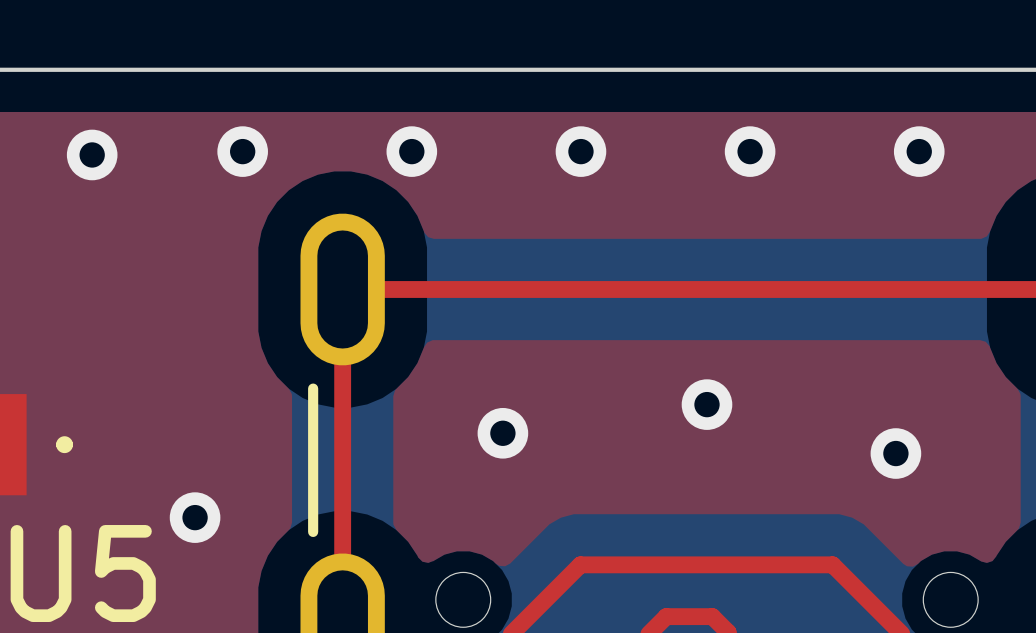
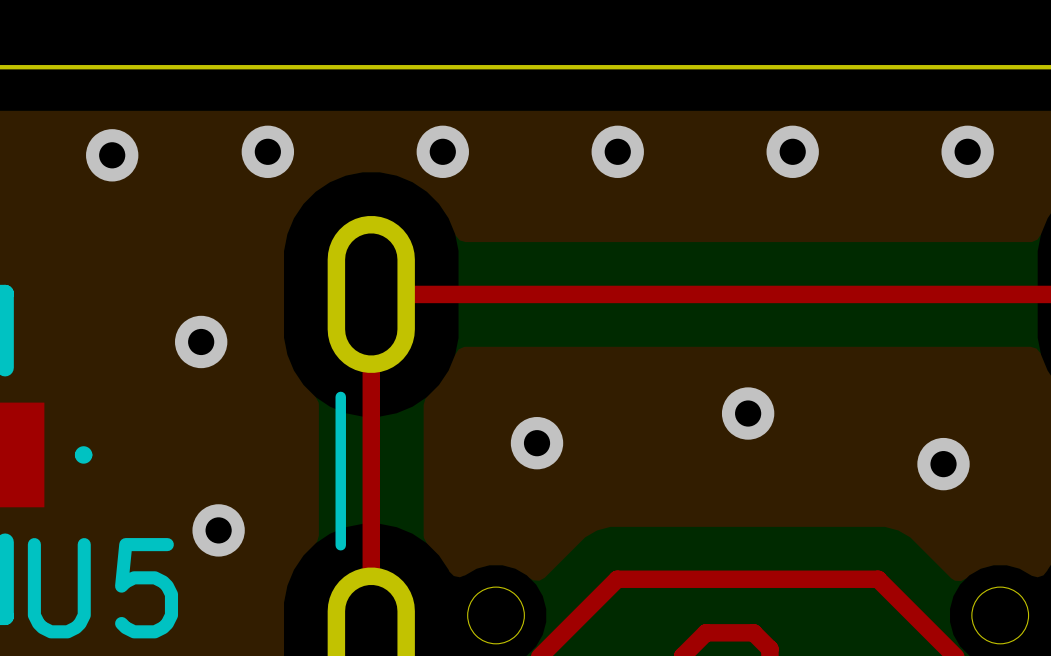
via: none -> (201, 341)

